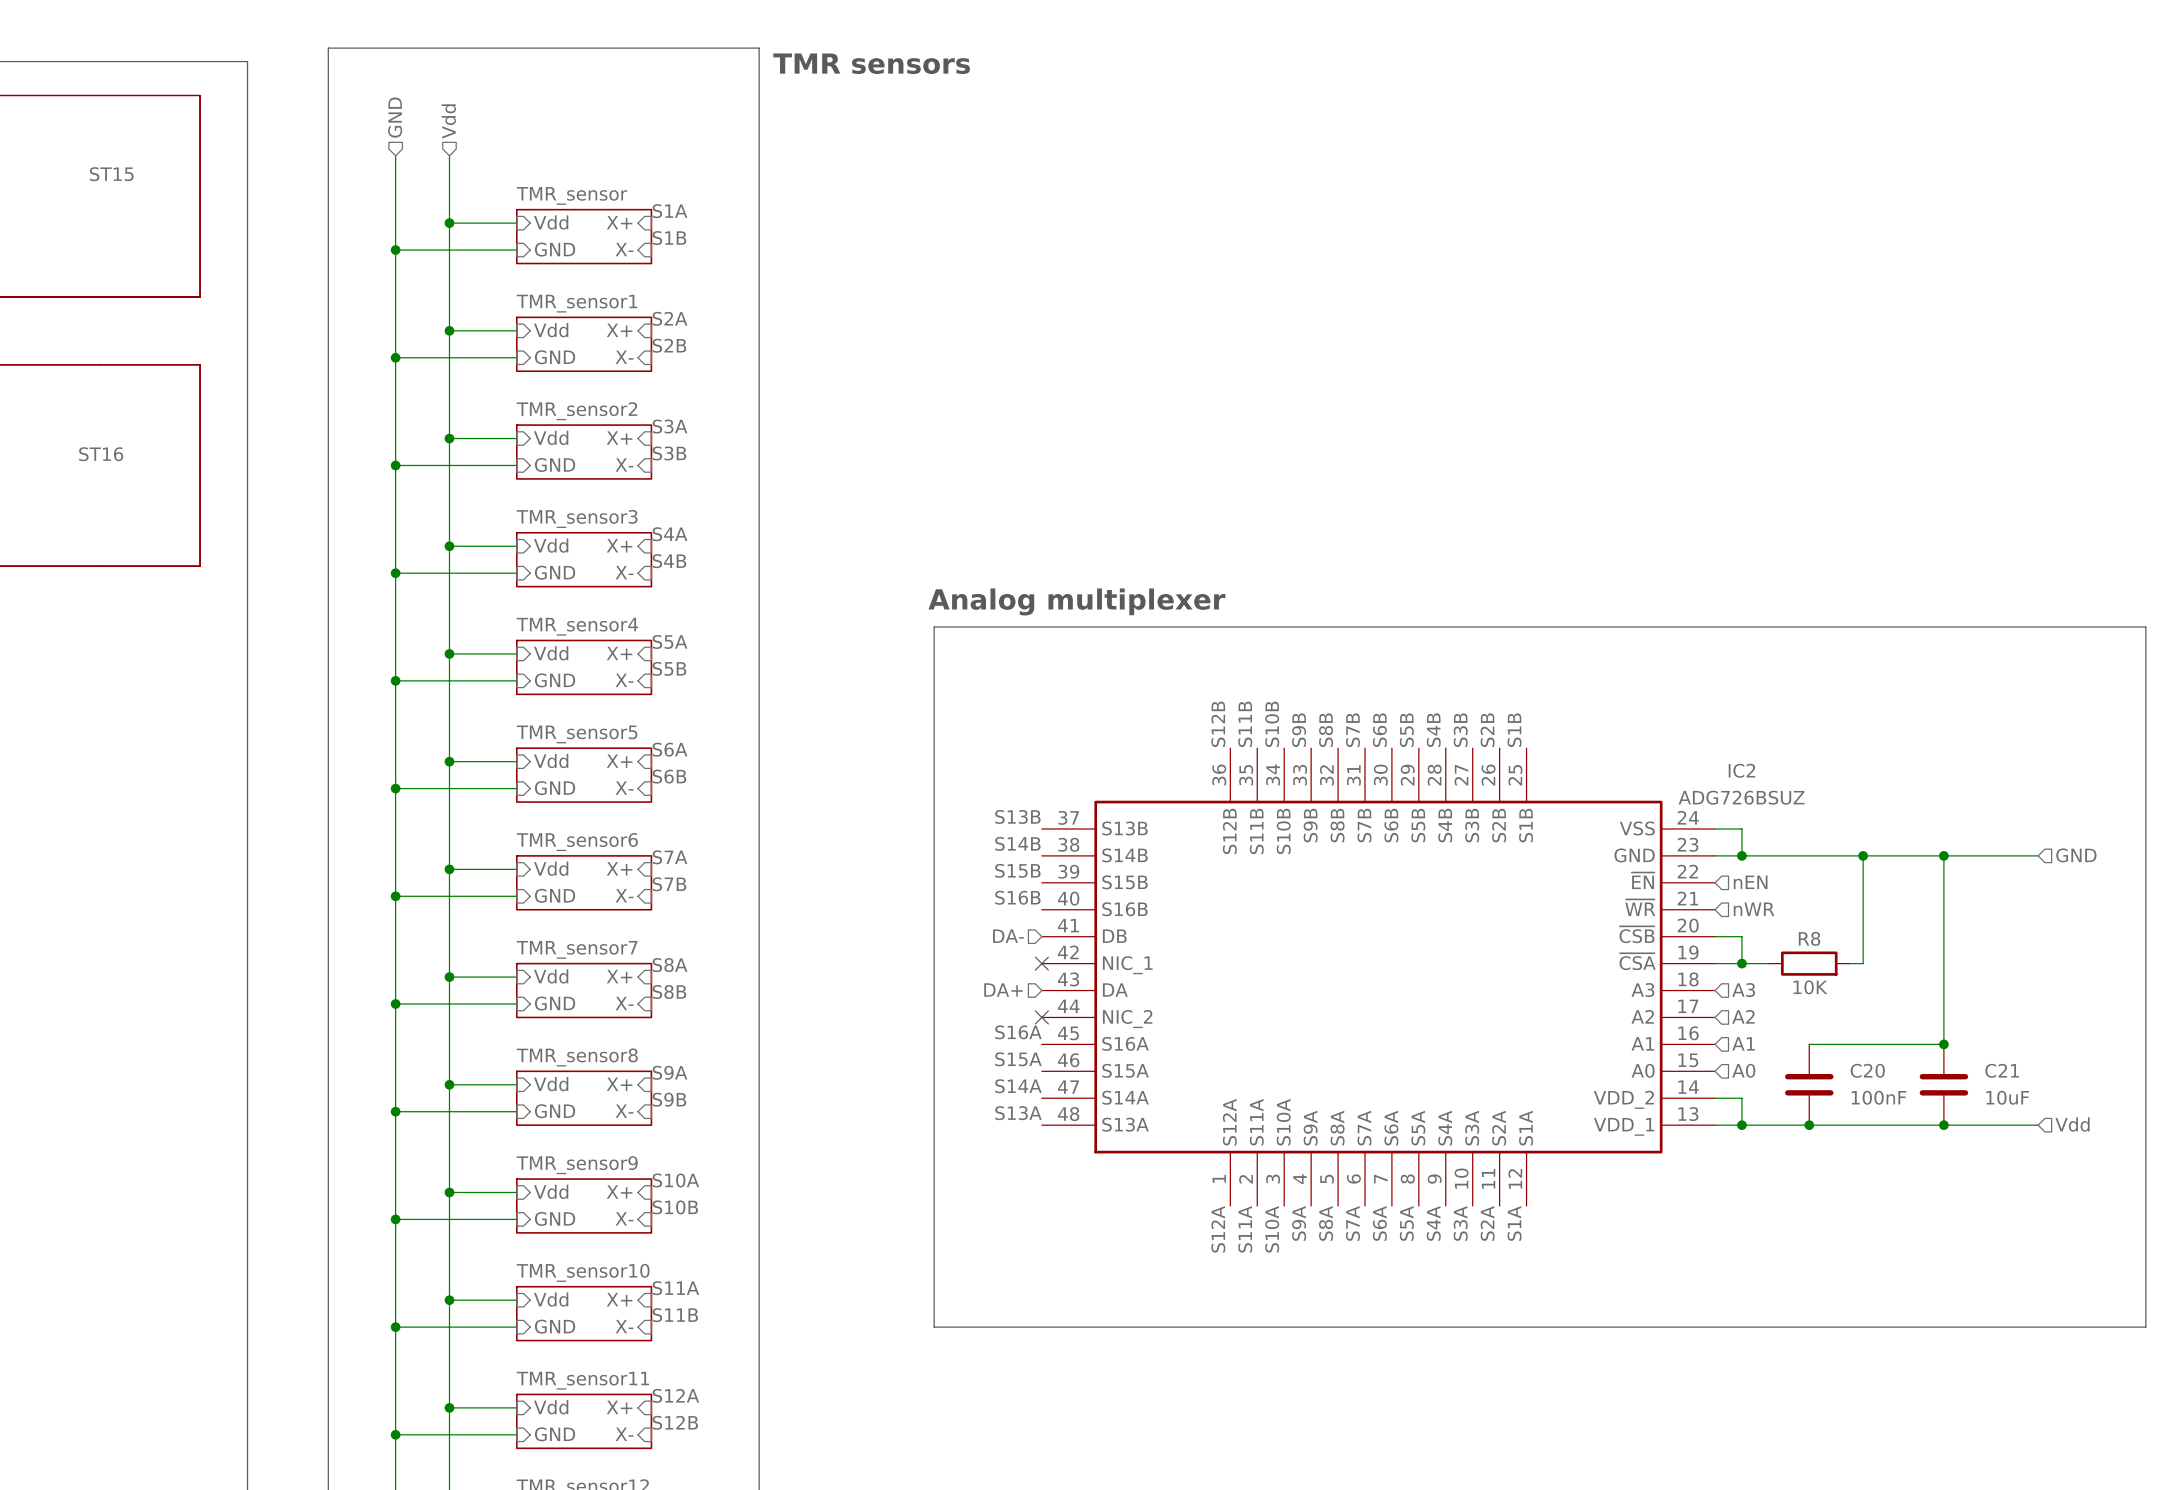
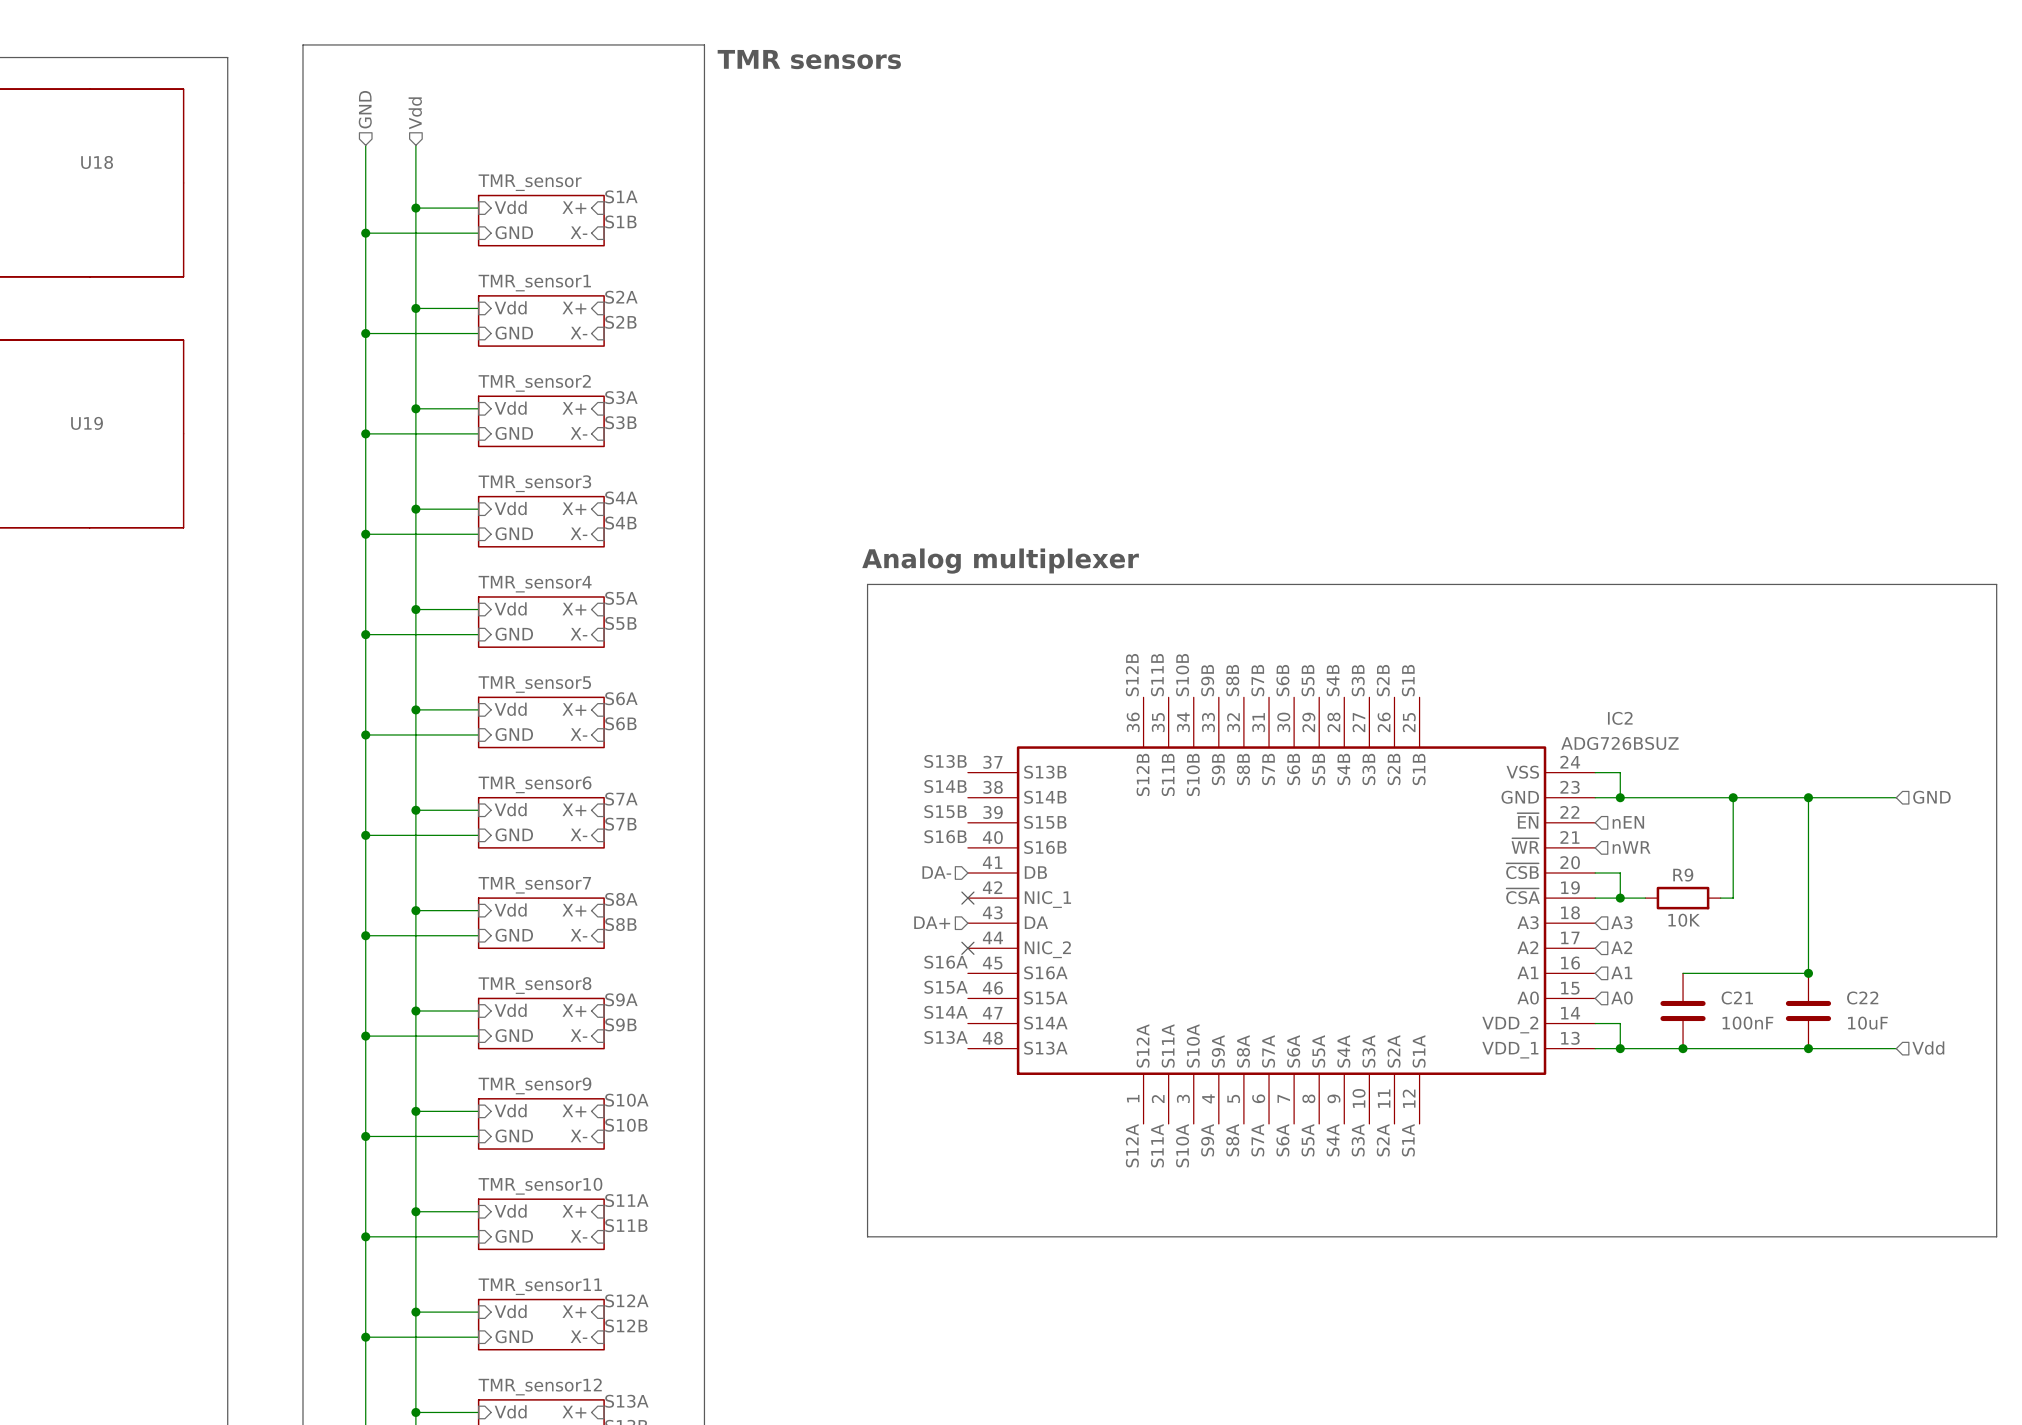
ST15 name: ST15 (111, 174) -> U18 (97, 162)
ST16 name: ST16 (101, 454) -> U19 (87, 423)
R8 name: R8 (1809, 938) -> R9 (1683, 875)
C20 name: C20 (1867, 1070) -> C21 (1737, 997)
C21 name: C21 (2002, 1070) -> C22 (1862, 997)

